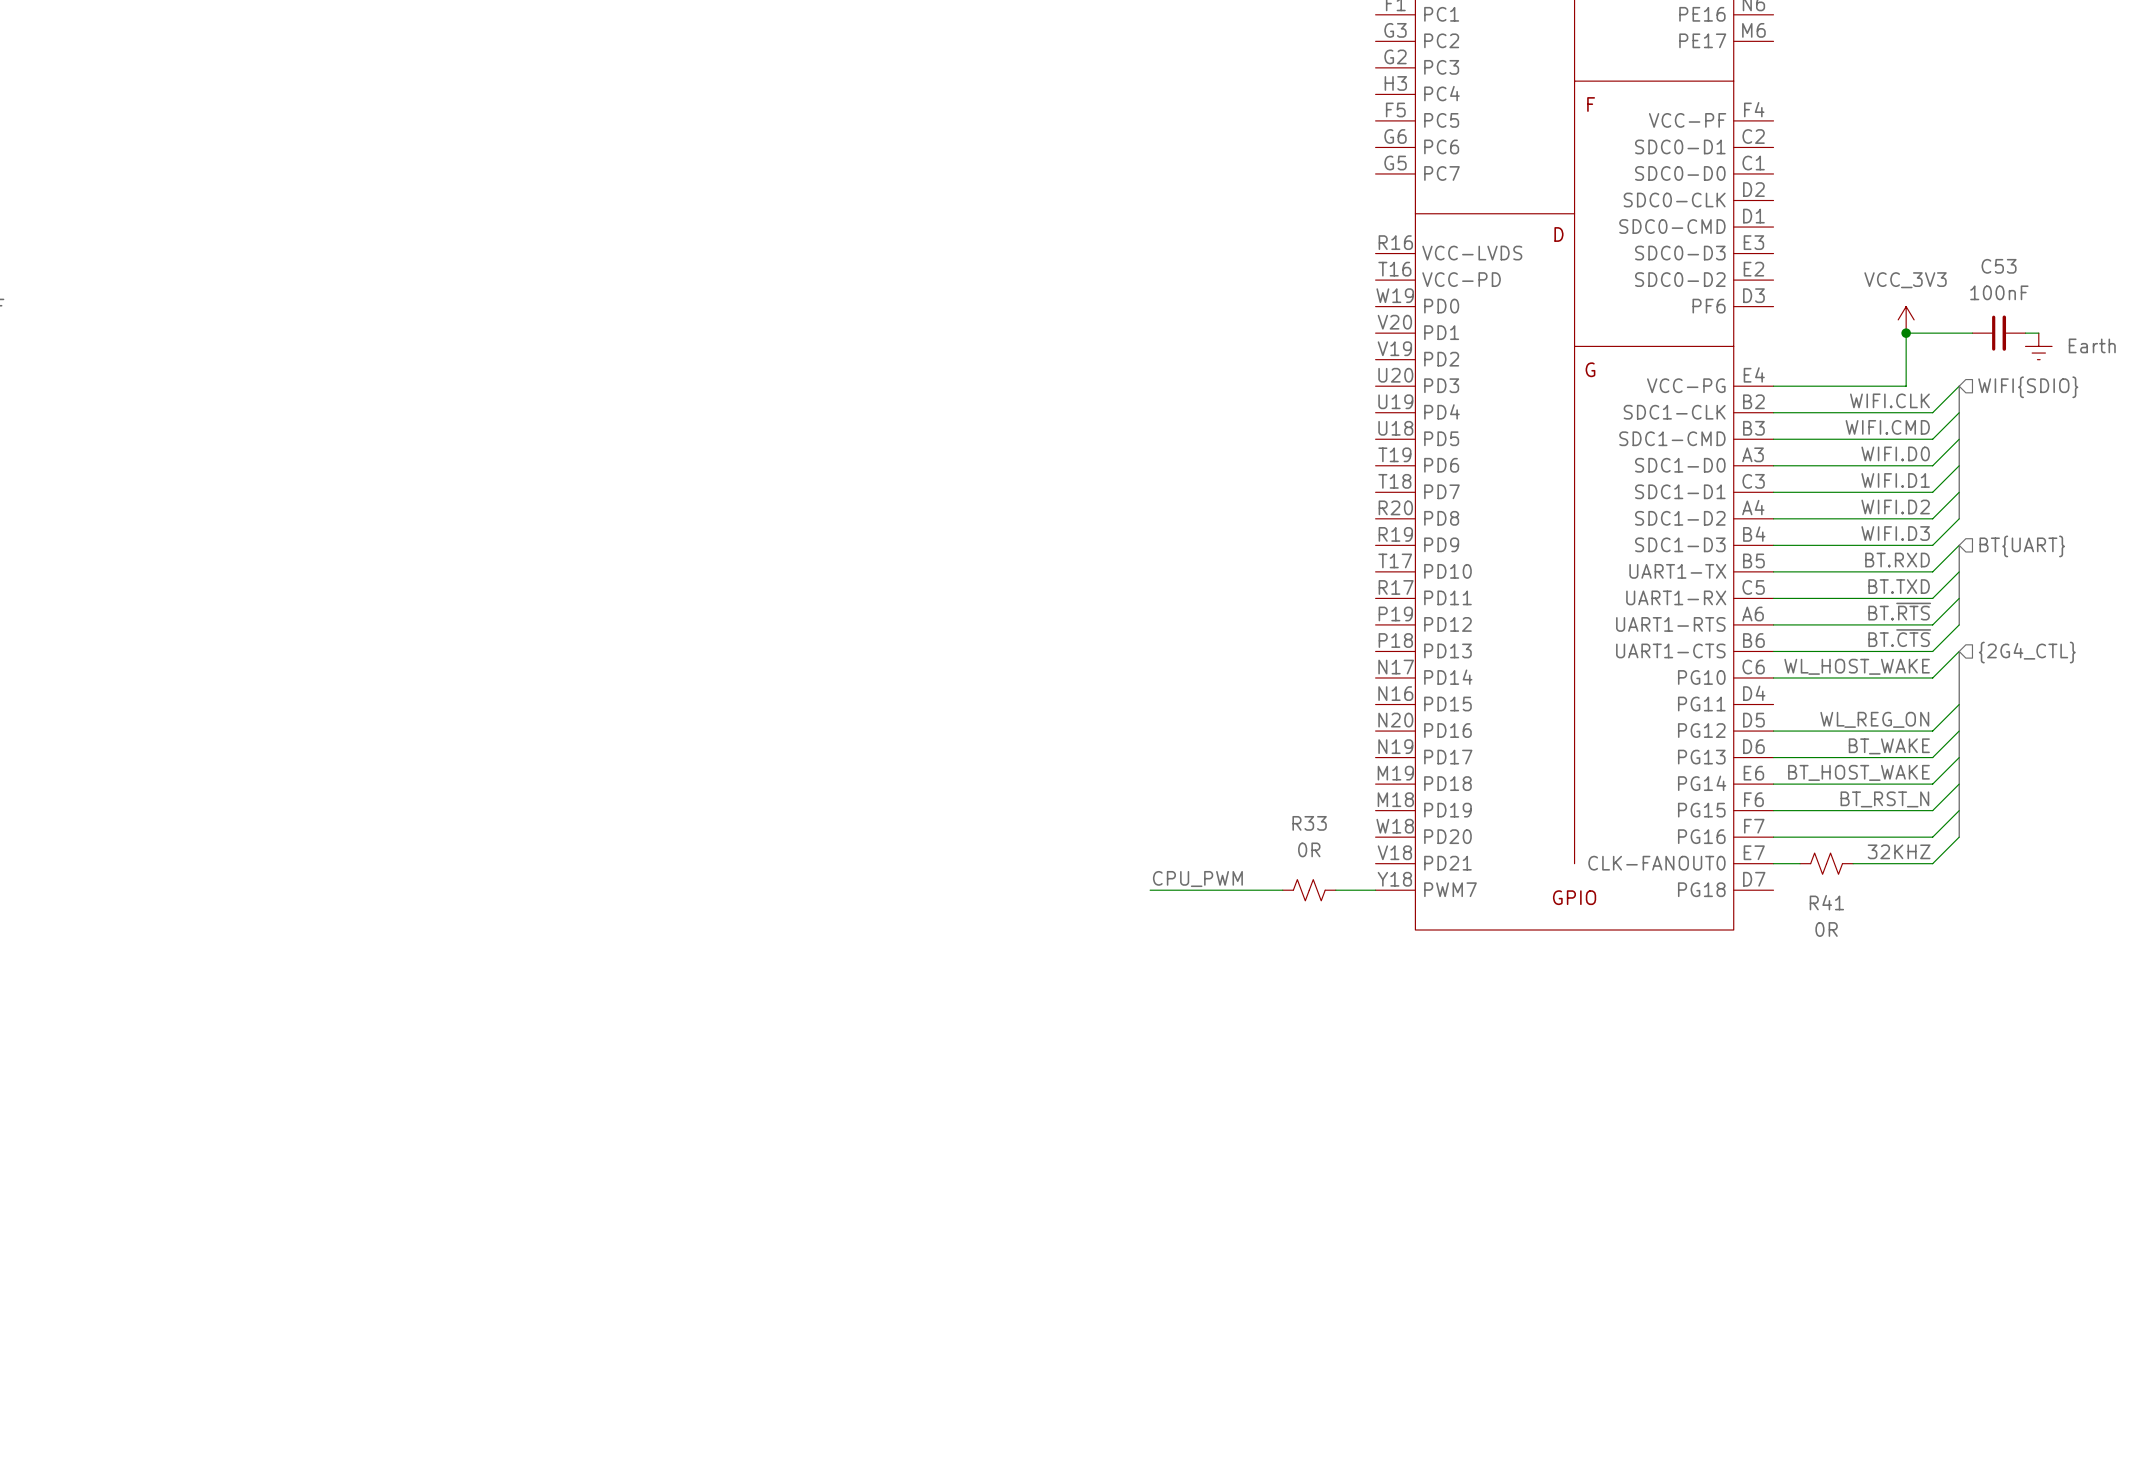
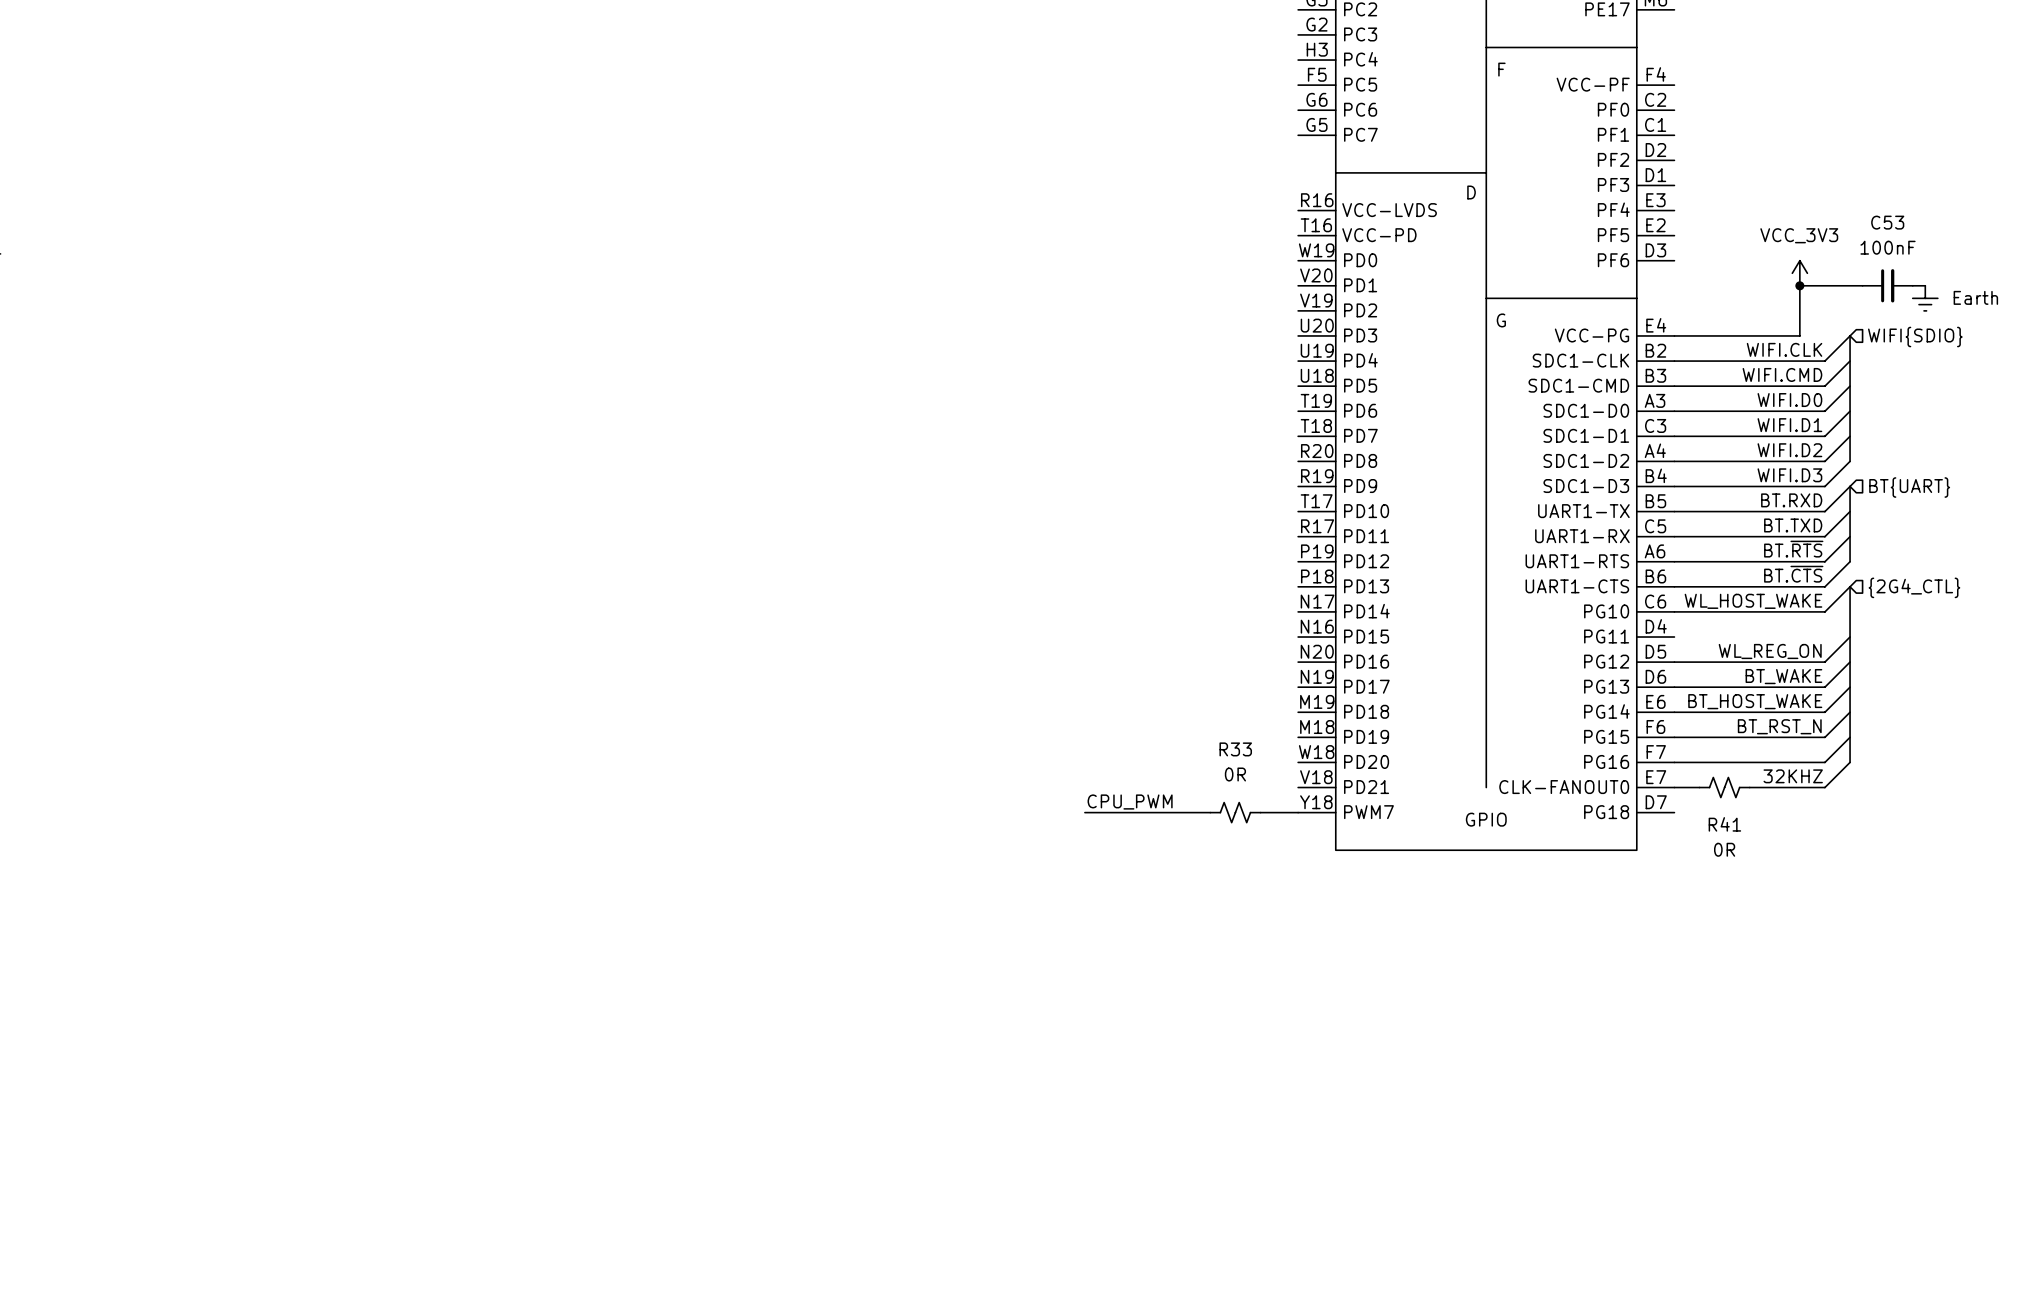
part pin name: SDC0-D1 (1680, 146) -> PF0 (1613, 109)
part pin name: SDC0-D0 (1680, 173) -> PF1 (1613, 134)
part pin name: SDC0-CLK (1674, 200) -> PF2 (1613, 159)
part pin name: SDC0-CMD (1672, 226) -> PF3 (1613, 184)
part pin name: SDC0-D3 (1680, 253) -> PF4 (1613, 209)
part pin name: SDC0-D2 (1680, 279) -> PF5 (1613, 235)

